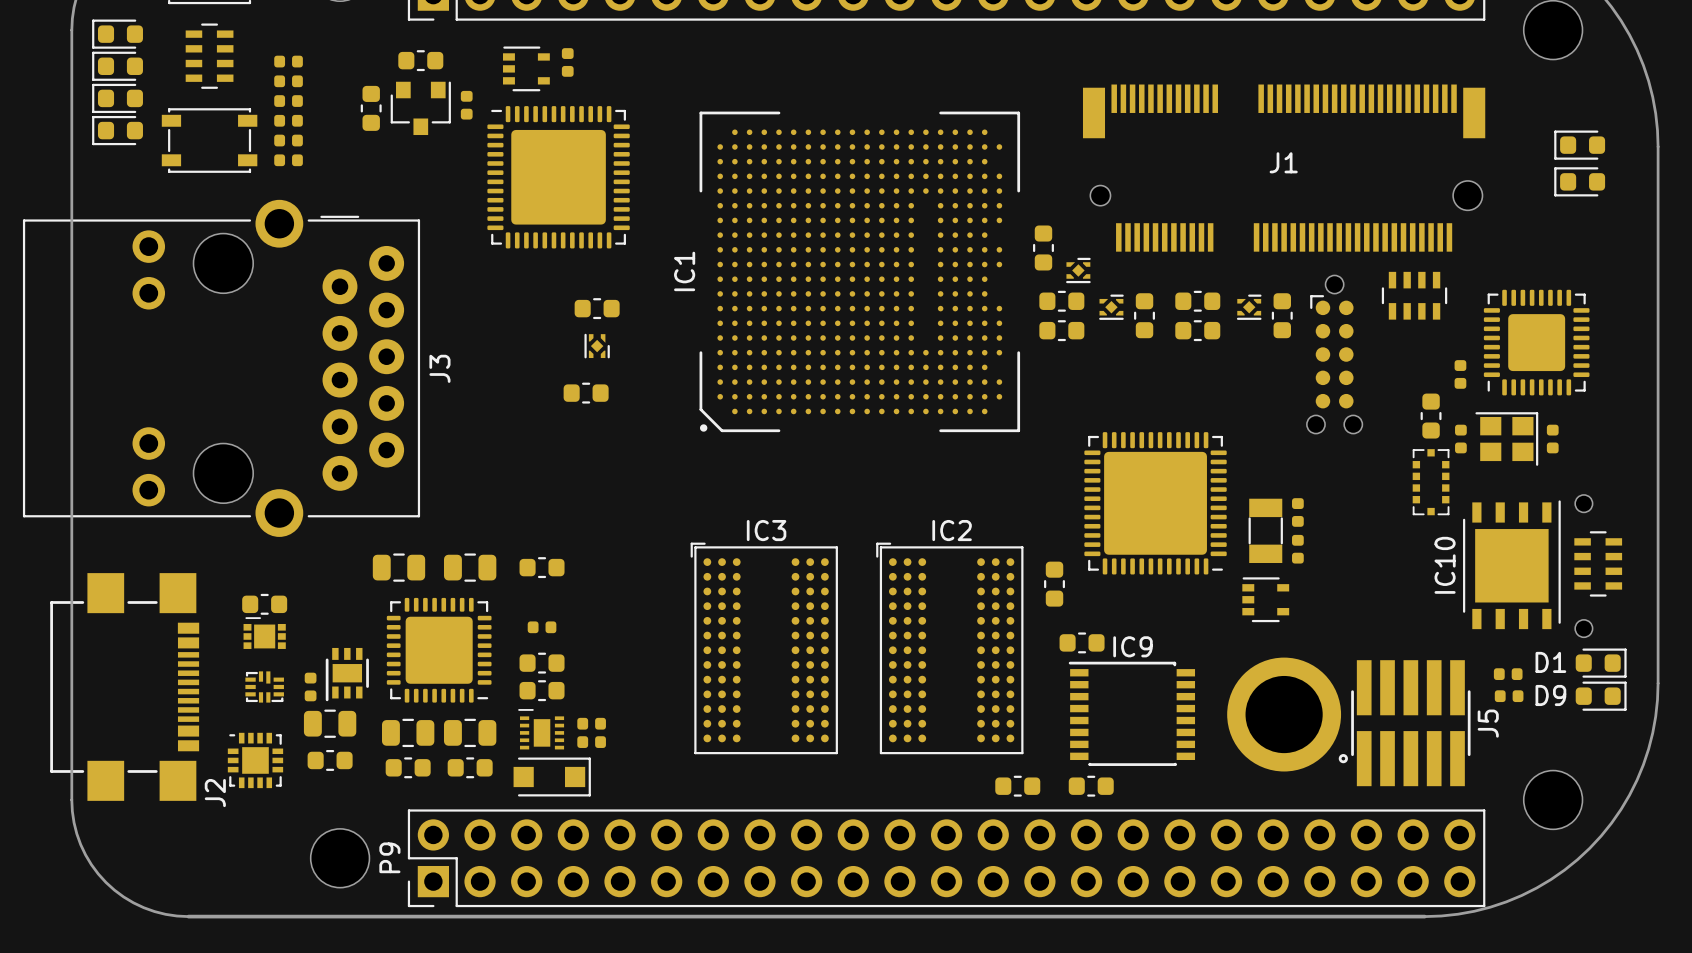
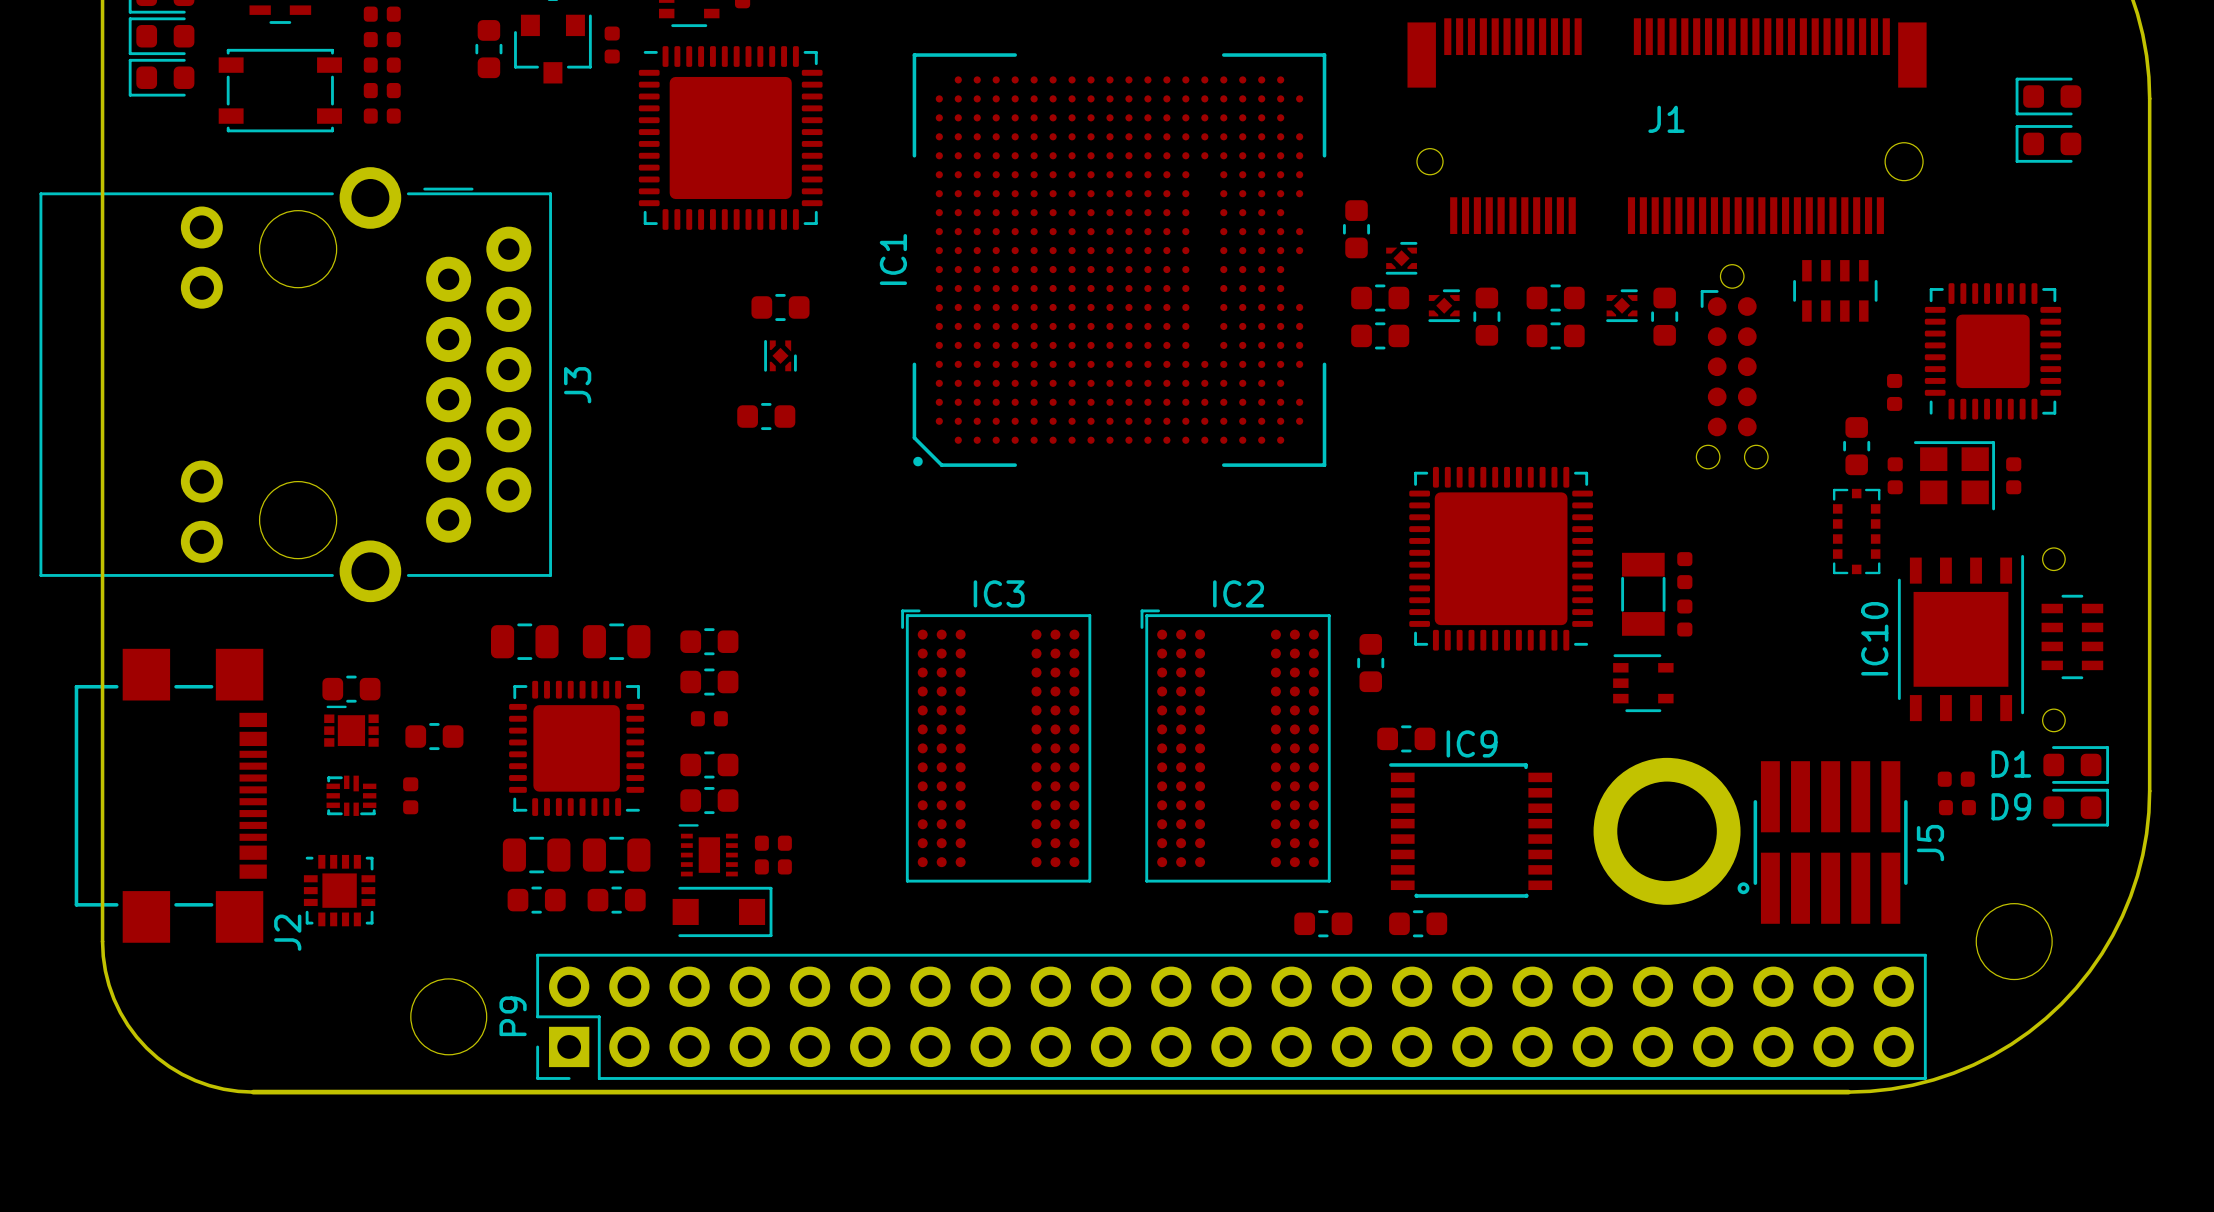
part: none -> (709, 682)
part: (347, 674) -> none
part: (330, 723) -> none
part position: (330, 760) -> (434, 736)

